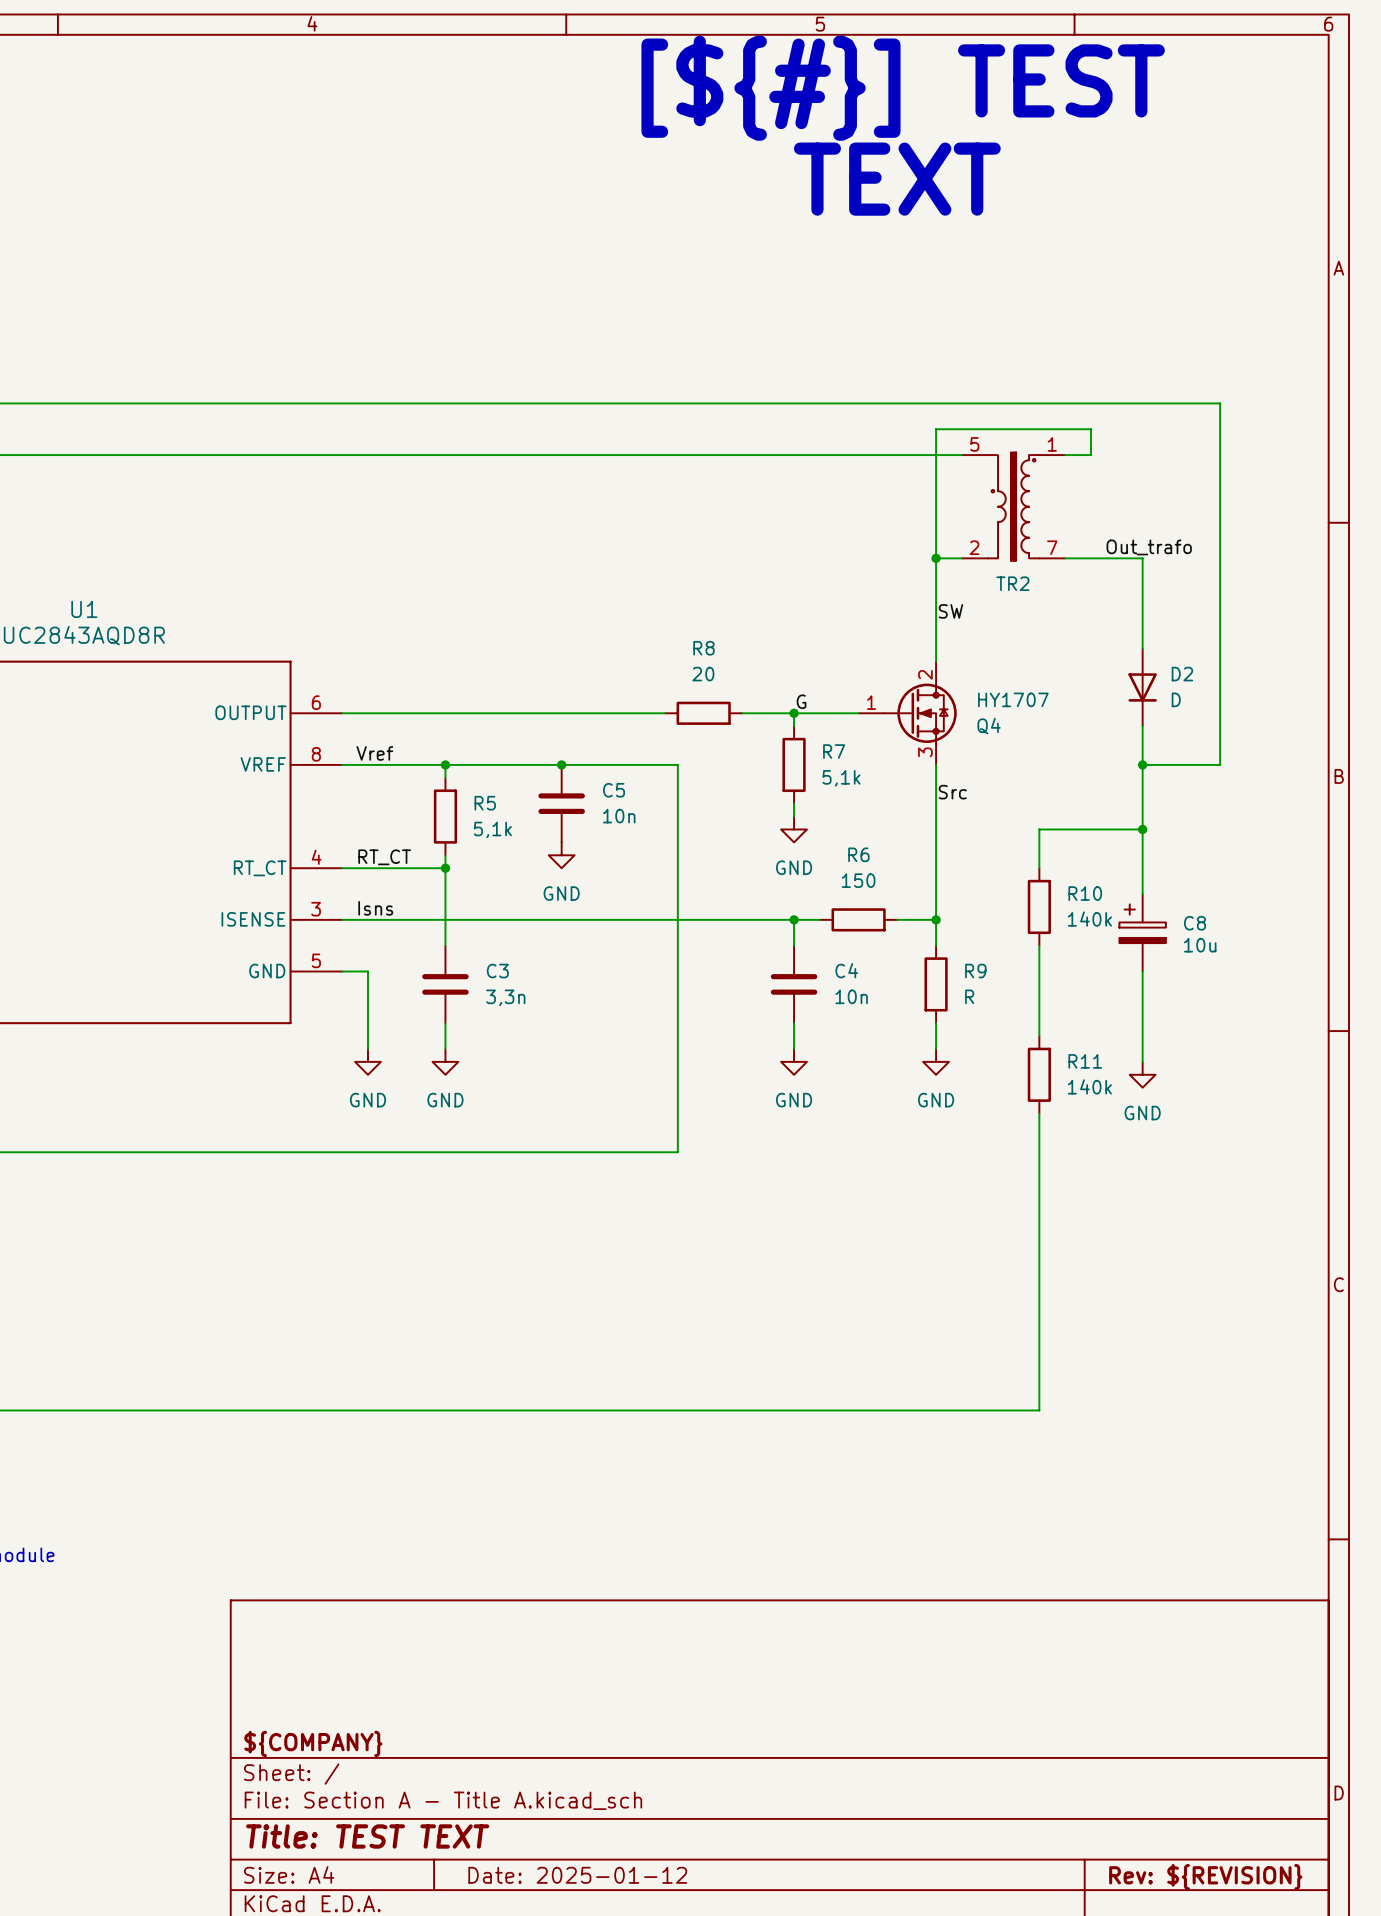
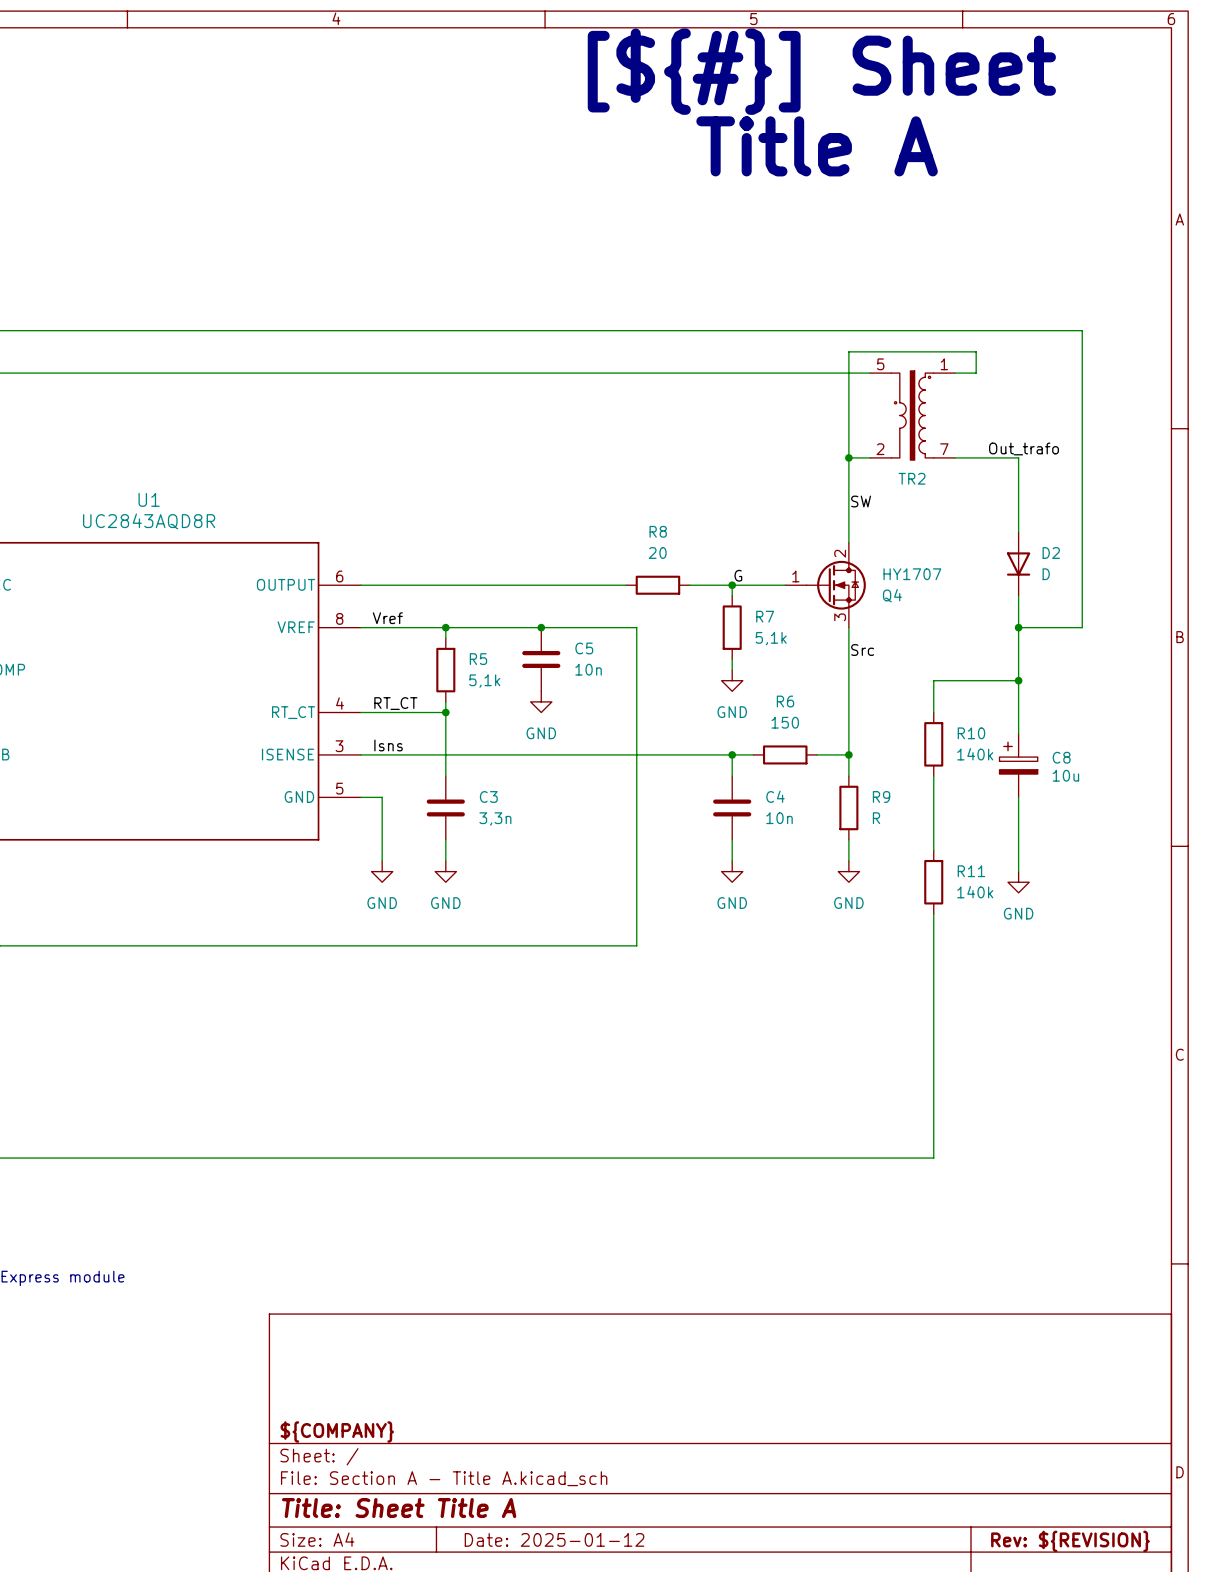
text: [${#}] TEST (903, 88) -> [${#}] Sheet (821, 71)
text: TEXT (897, 179) -> Title A (817, 146)
title block: Title: TEST TEXT (367, 1836) -> Title: Sheet Title A (399, 1508)

